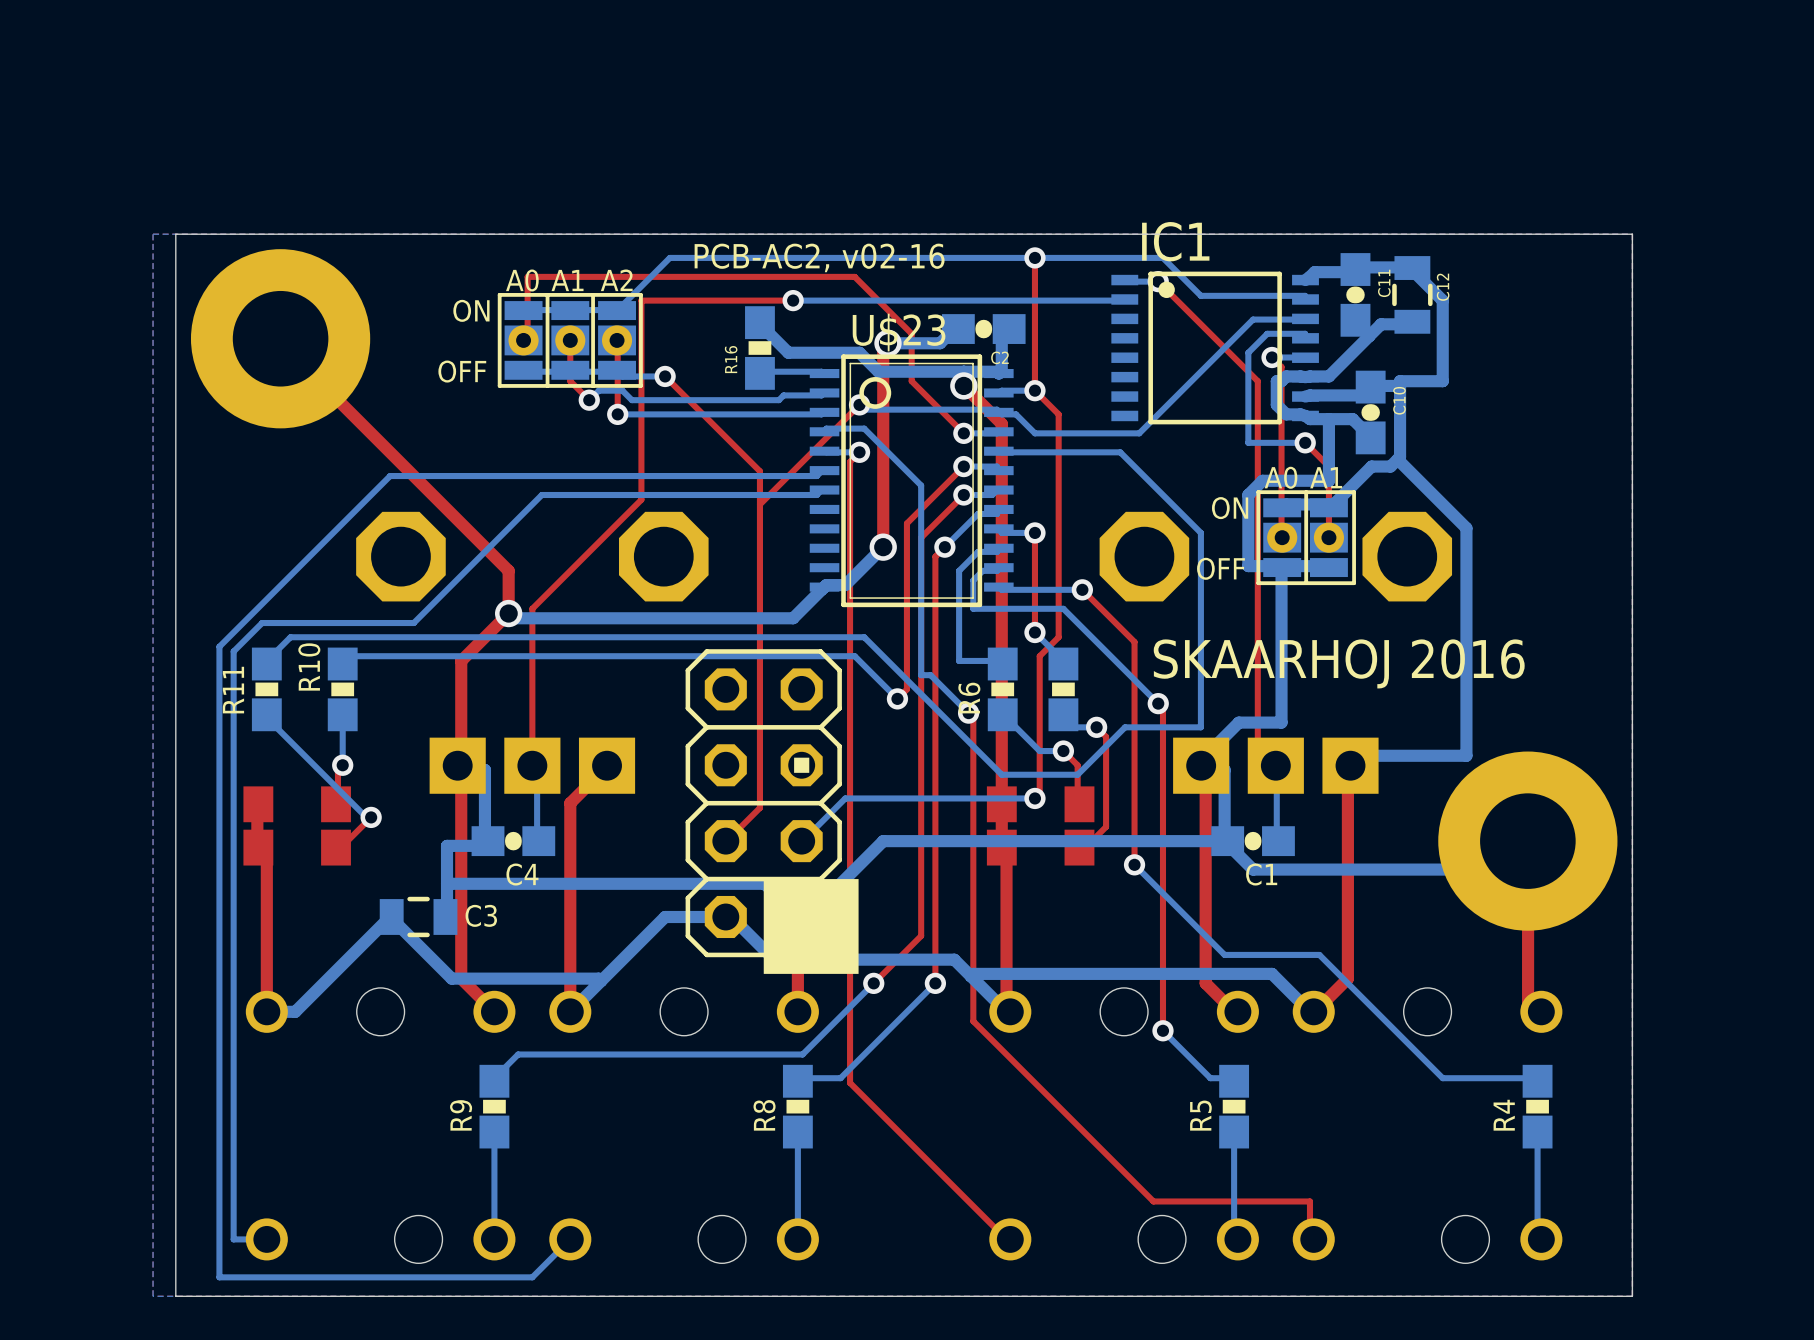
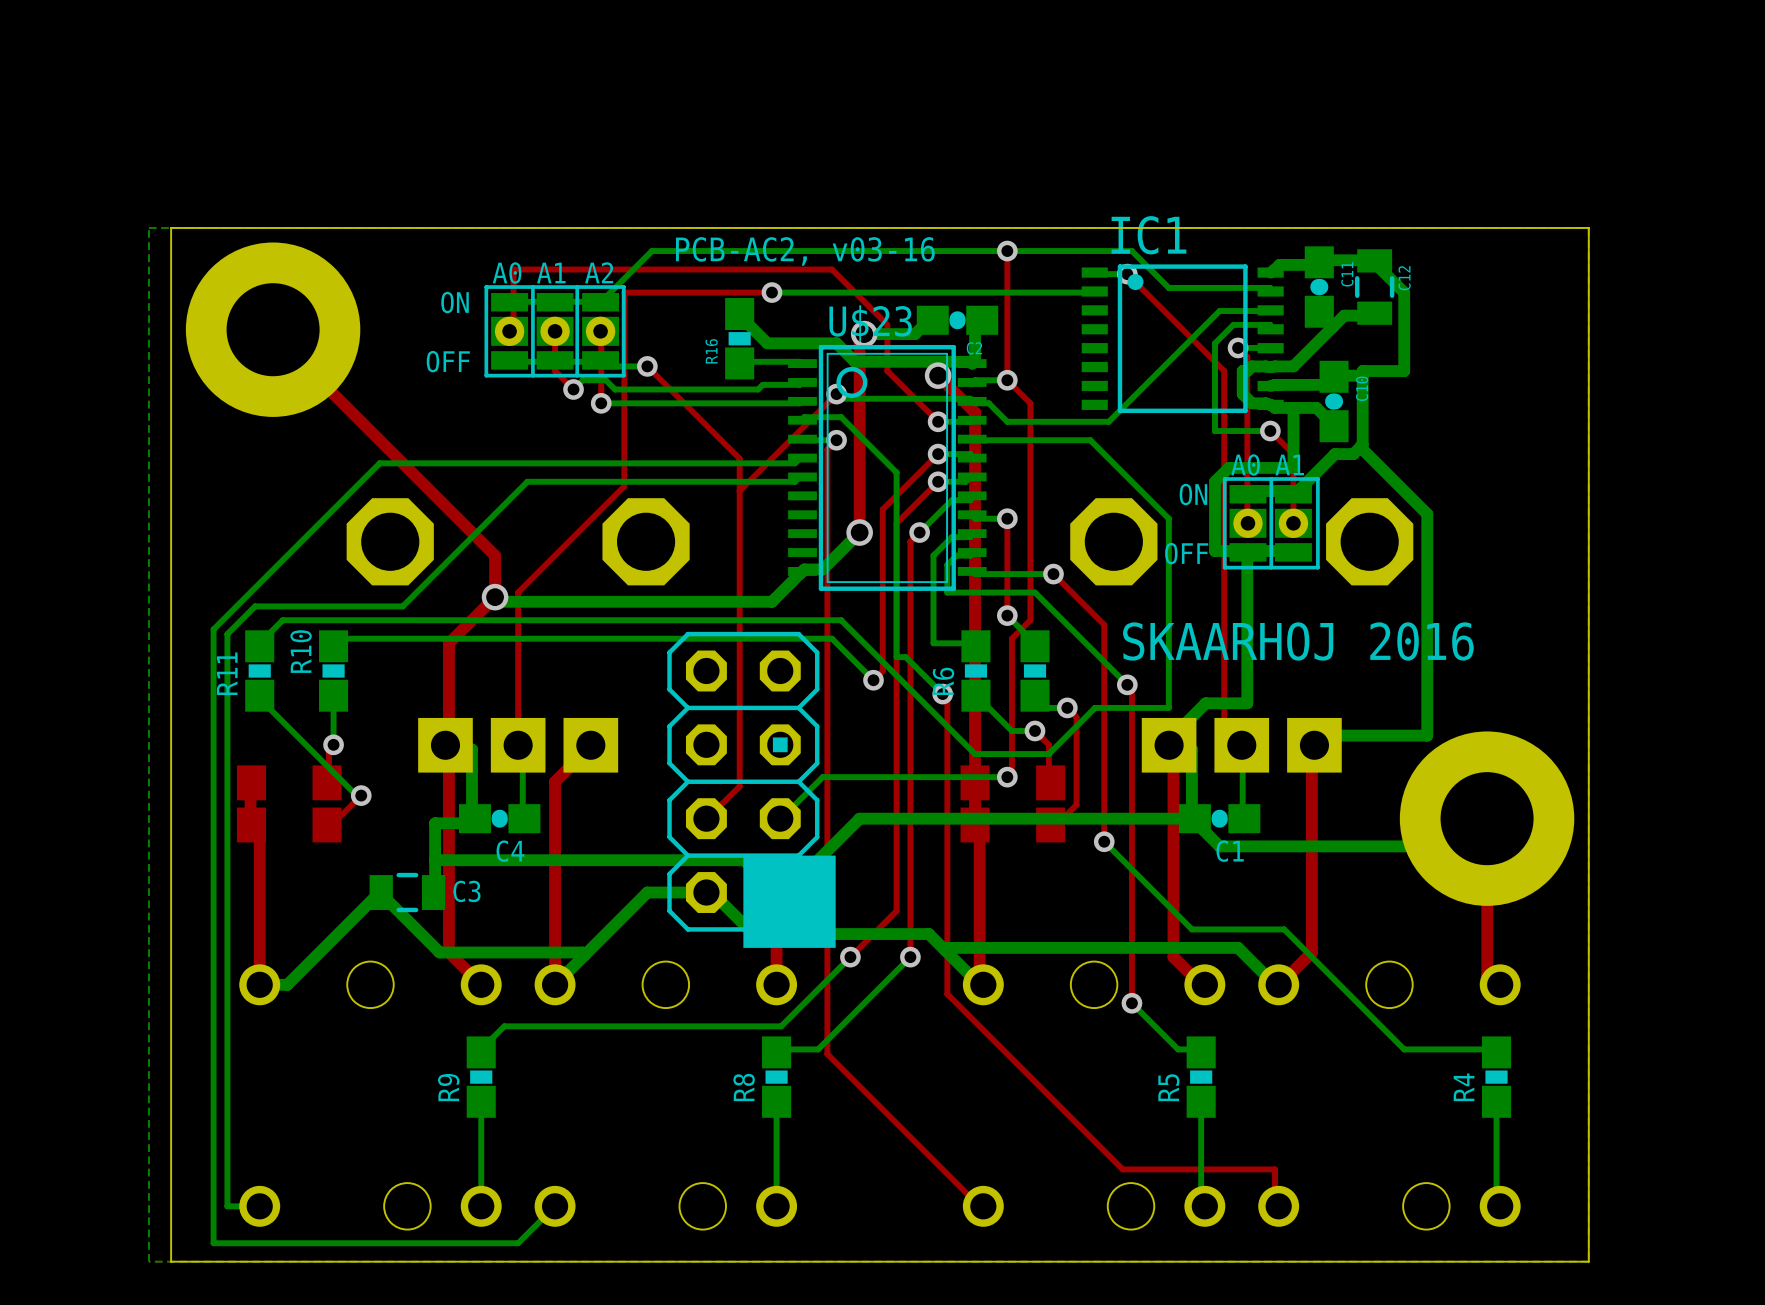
text: PCB-AC2, v02-16 (819, 257) -> PCB-AC2, v03-16 (805, 251)

